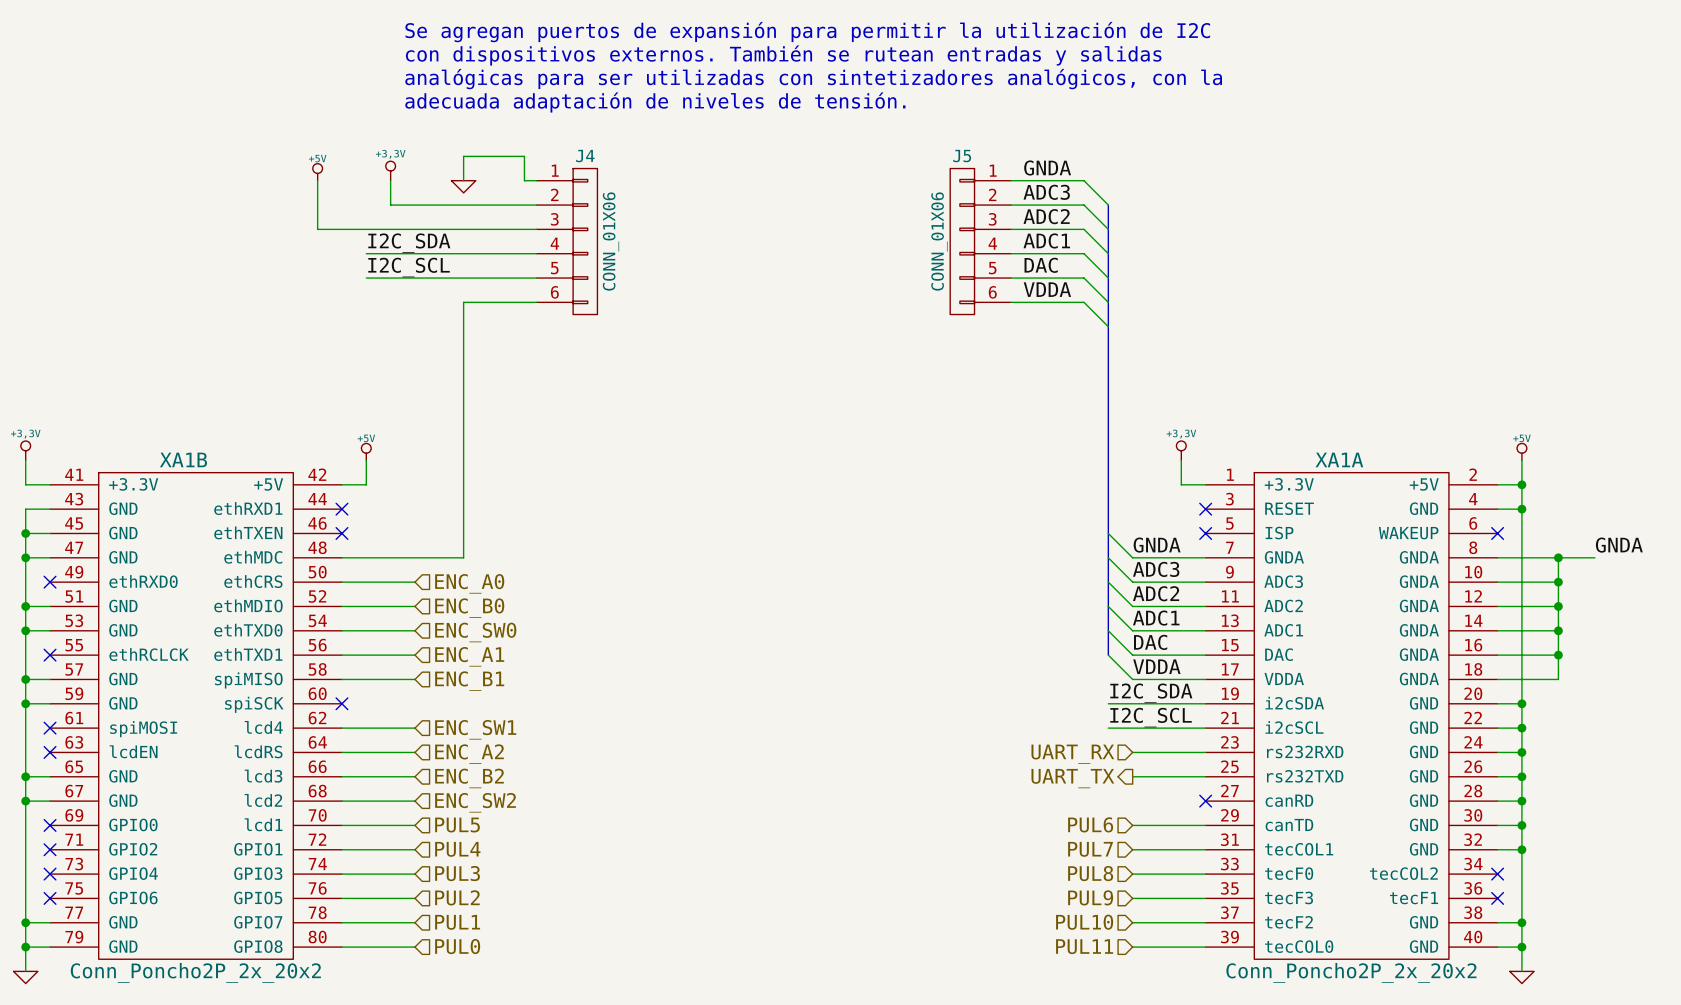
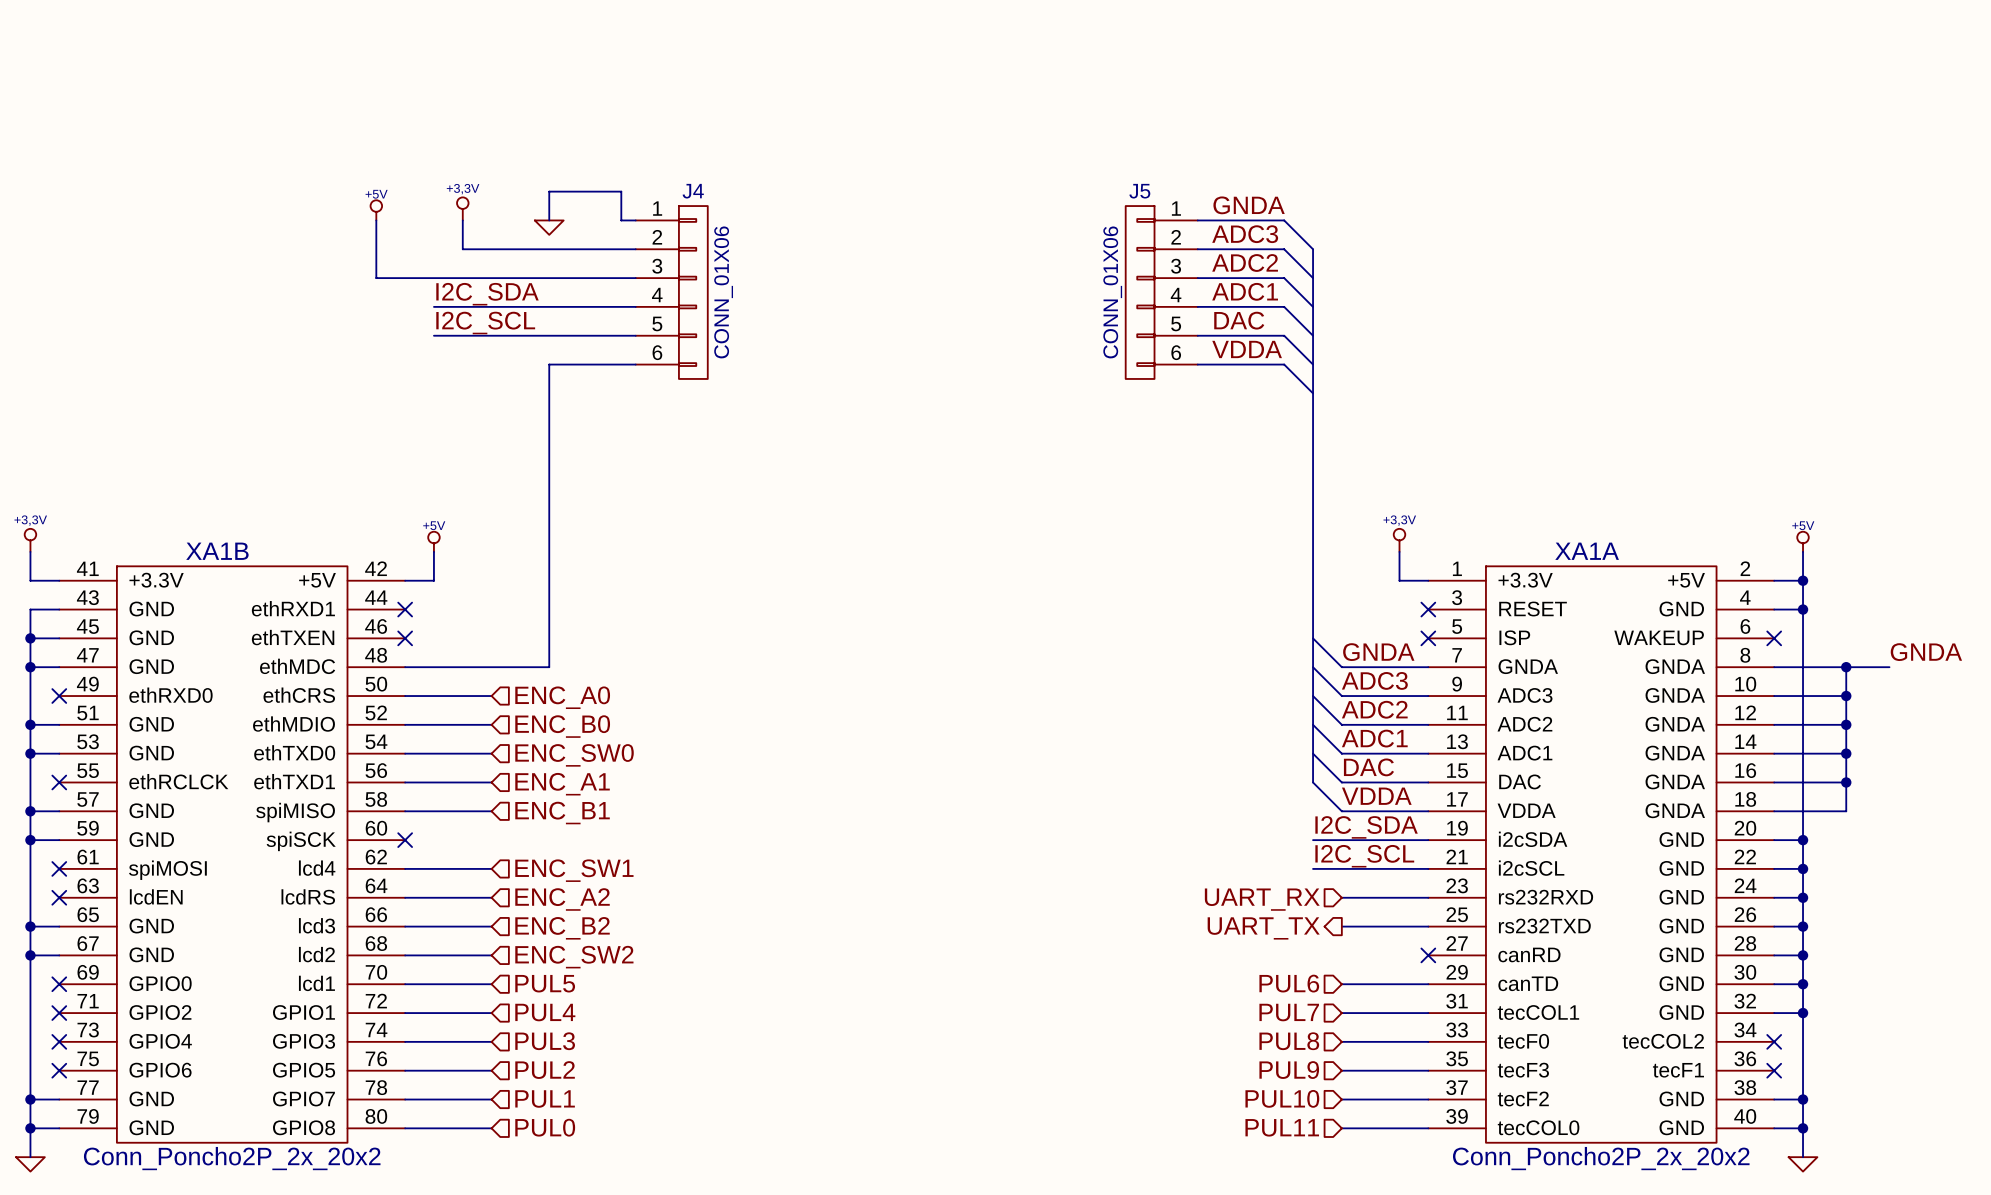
text: Se agregan puertos de expansión para permitir la utilización de I2C (807, 32) -> none
text: con dispositivos externos. También se rutean entradas y salidas (783, 55) -> none
text: analógicas para ser utilizadas con sintetizadores analógicos, con la (813, 79) -> none
text: adecuada adaptación de niveles de tensión. (655, 102) -> none

